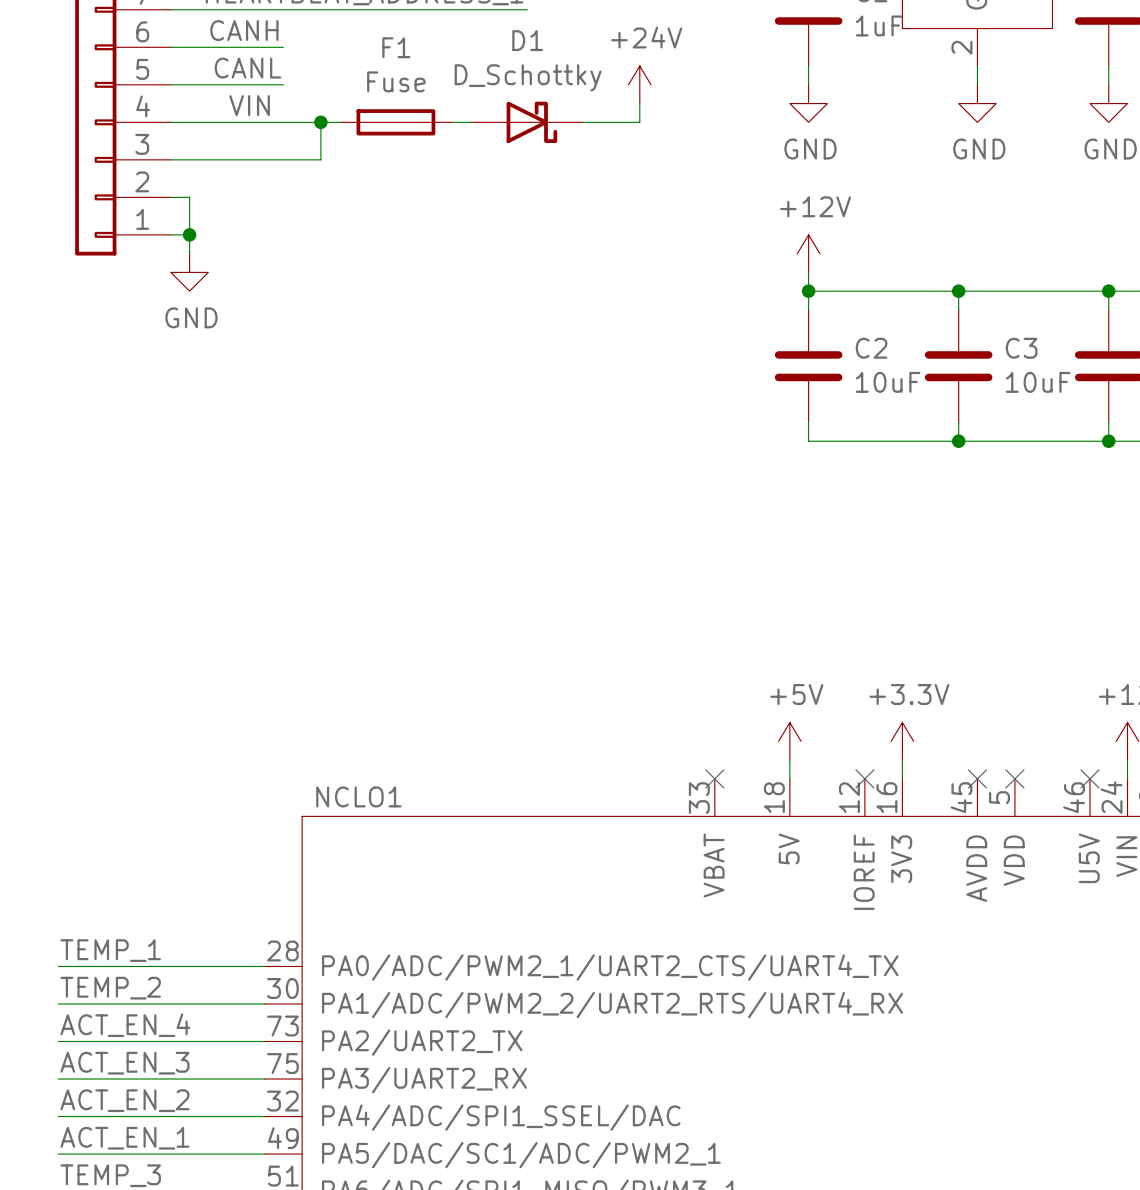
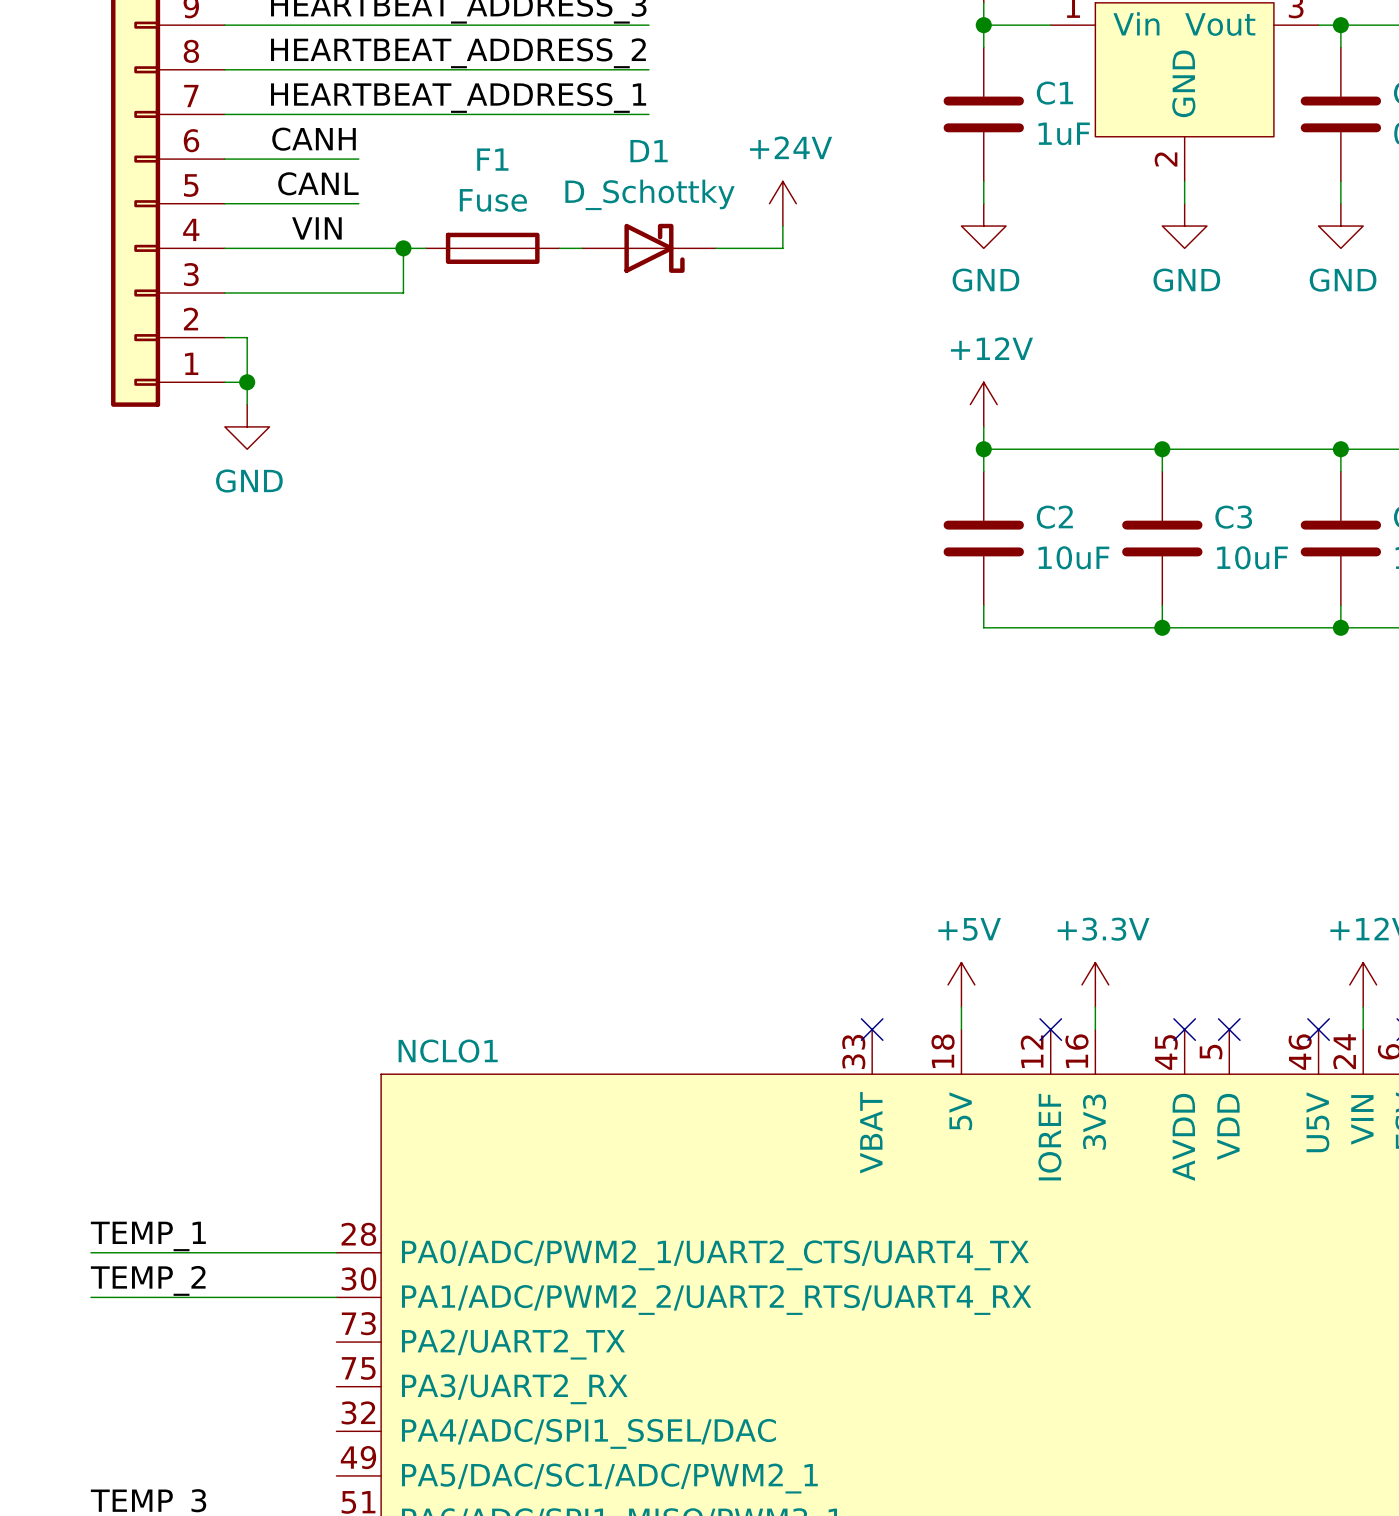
label: ACT_EN_4 (125, 1025) -> none
wire: (58, 1041) (264, 1041) -> none
label: ACT_EN_3 (124, 1063) -> none
wire: (58, 1079) (264, 1079) -> none
label: ACT_EN_2 (124, 1100) -> none
wire: (58, 1116) (264, 1116) -> none
label: ACT_EN_1 (124, 1138) -> none
wire: (58, 1154) (264, 1154) -> none

